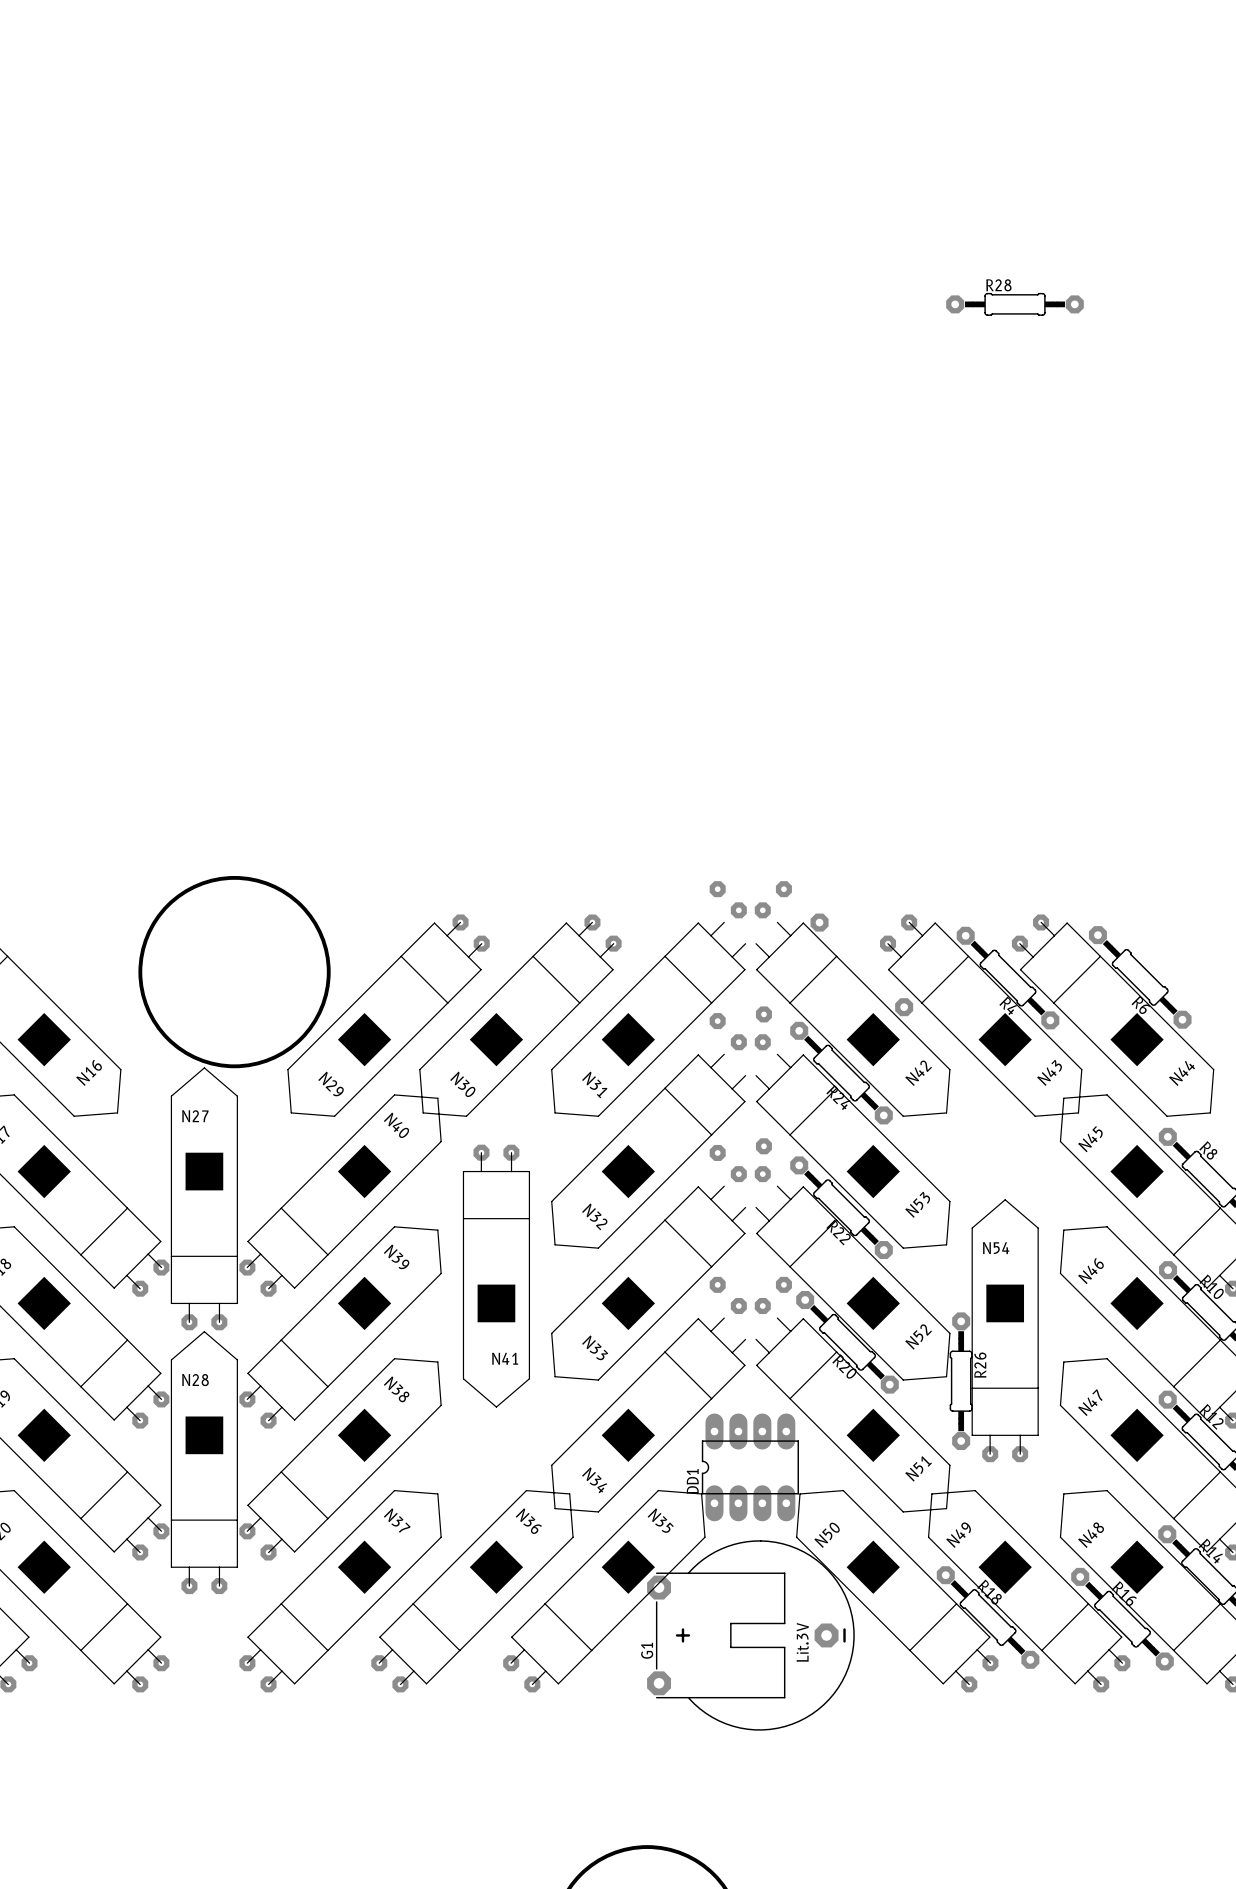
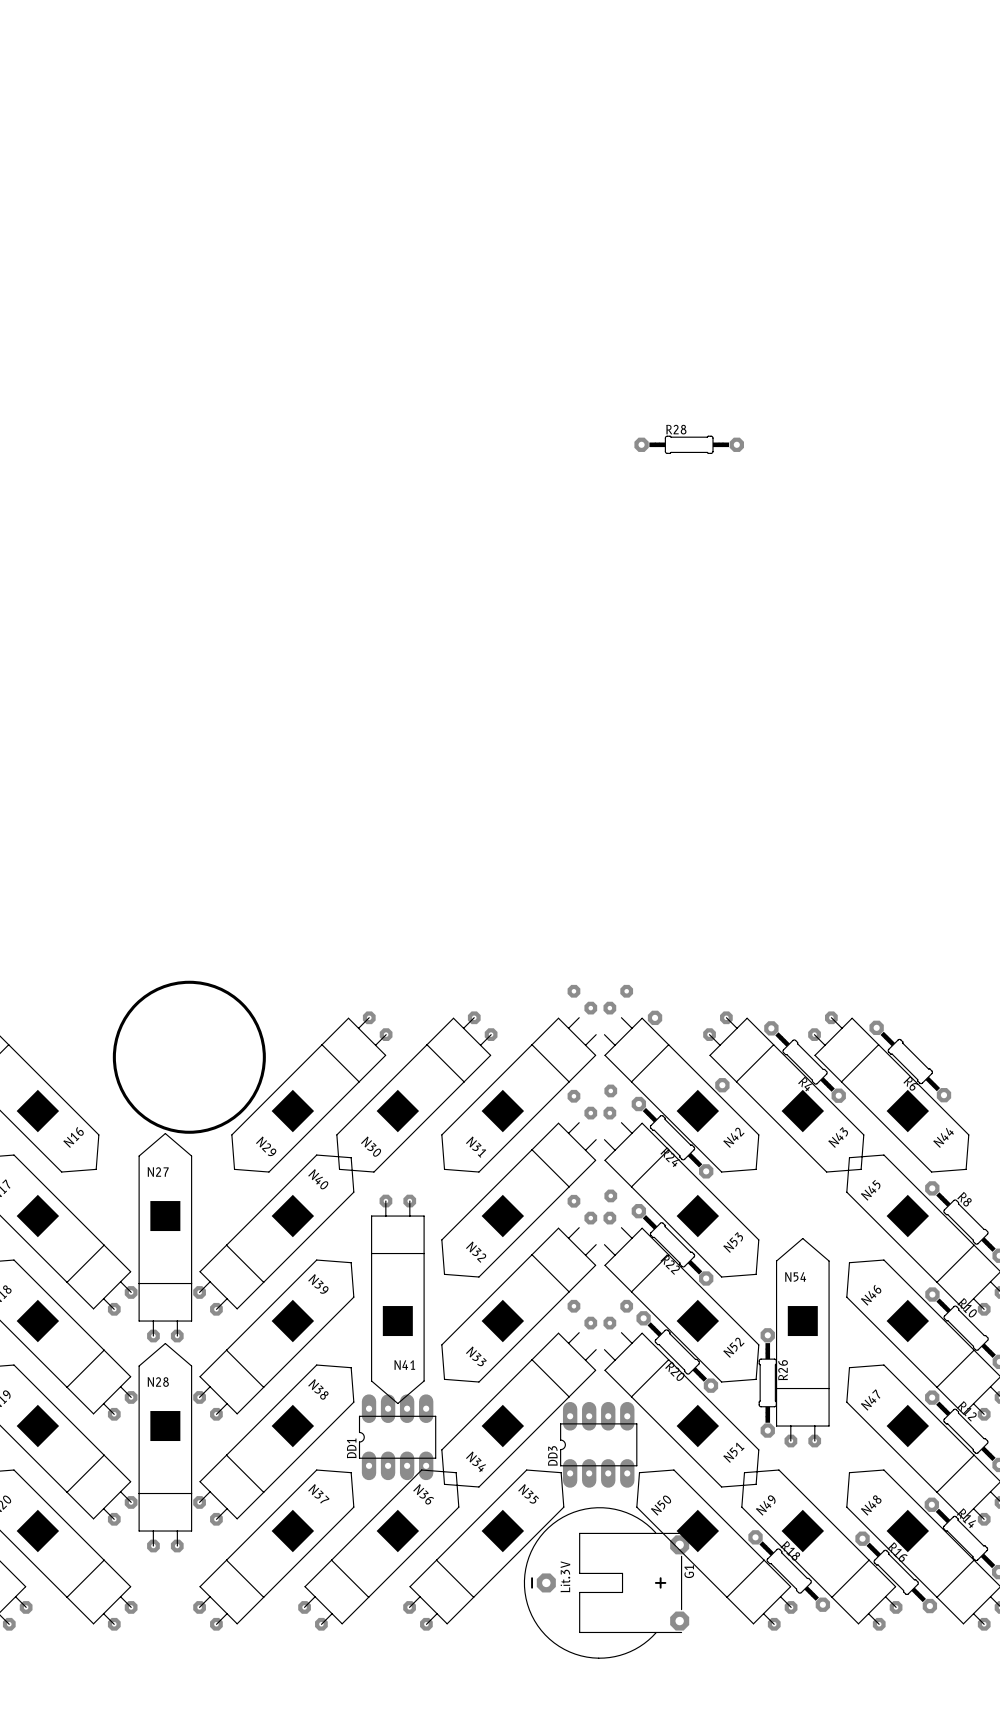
R28 position: (1015, 304) -> (689, 444)
DD3: none -> (598, 1444)
DD1 position: (750, 1467) -> (397, 1437)
G1 footprint: [647, 1540, 855, 1731] -> [523, 1507, 690, 1659]
G1 name position: G1 (647, 1650) -> G1 (689, 1571)

